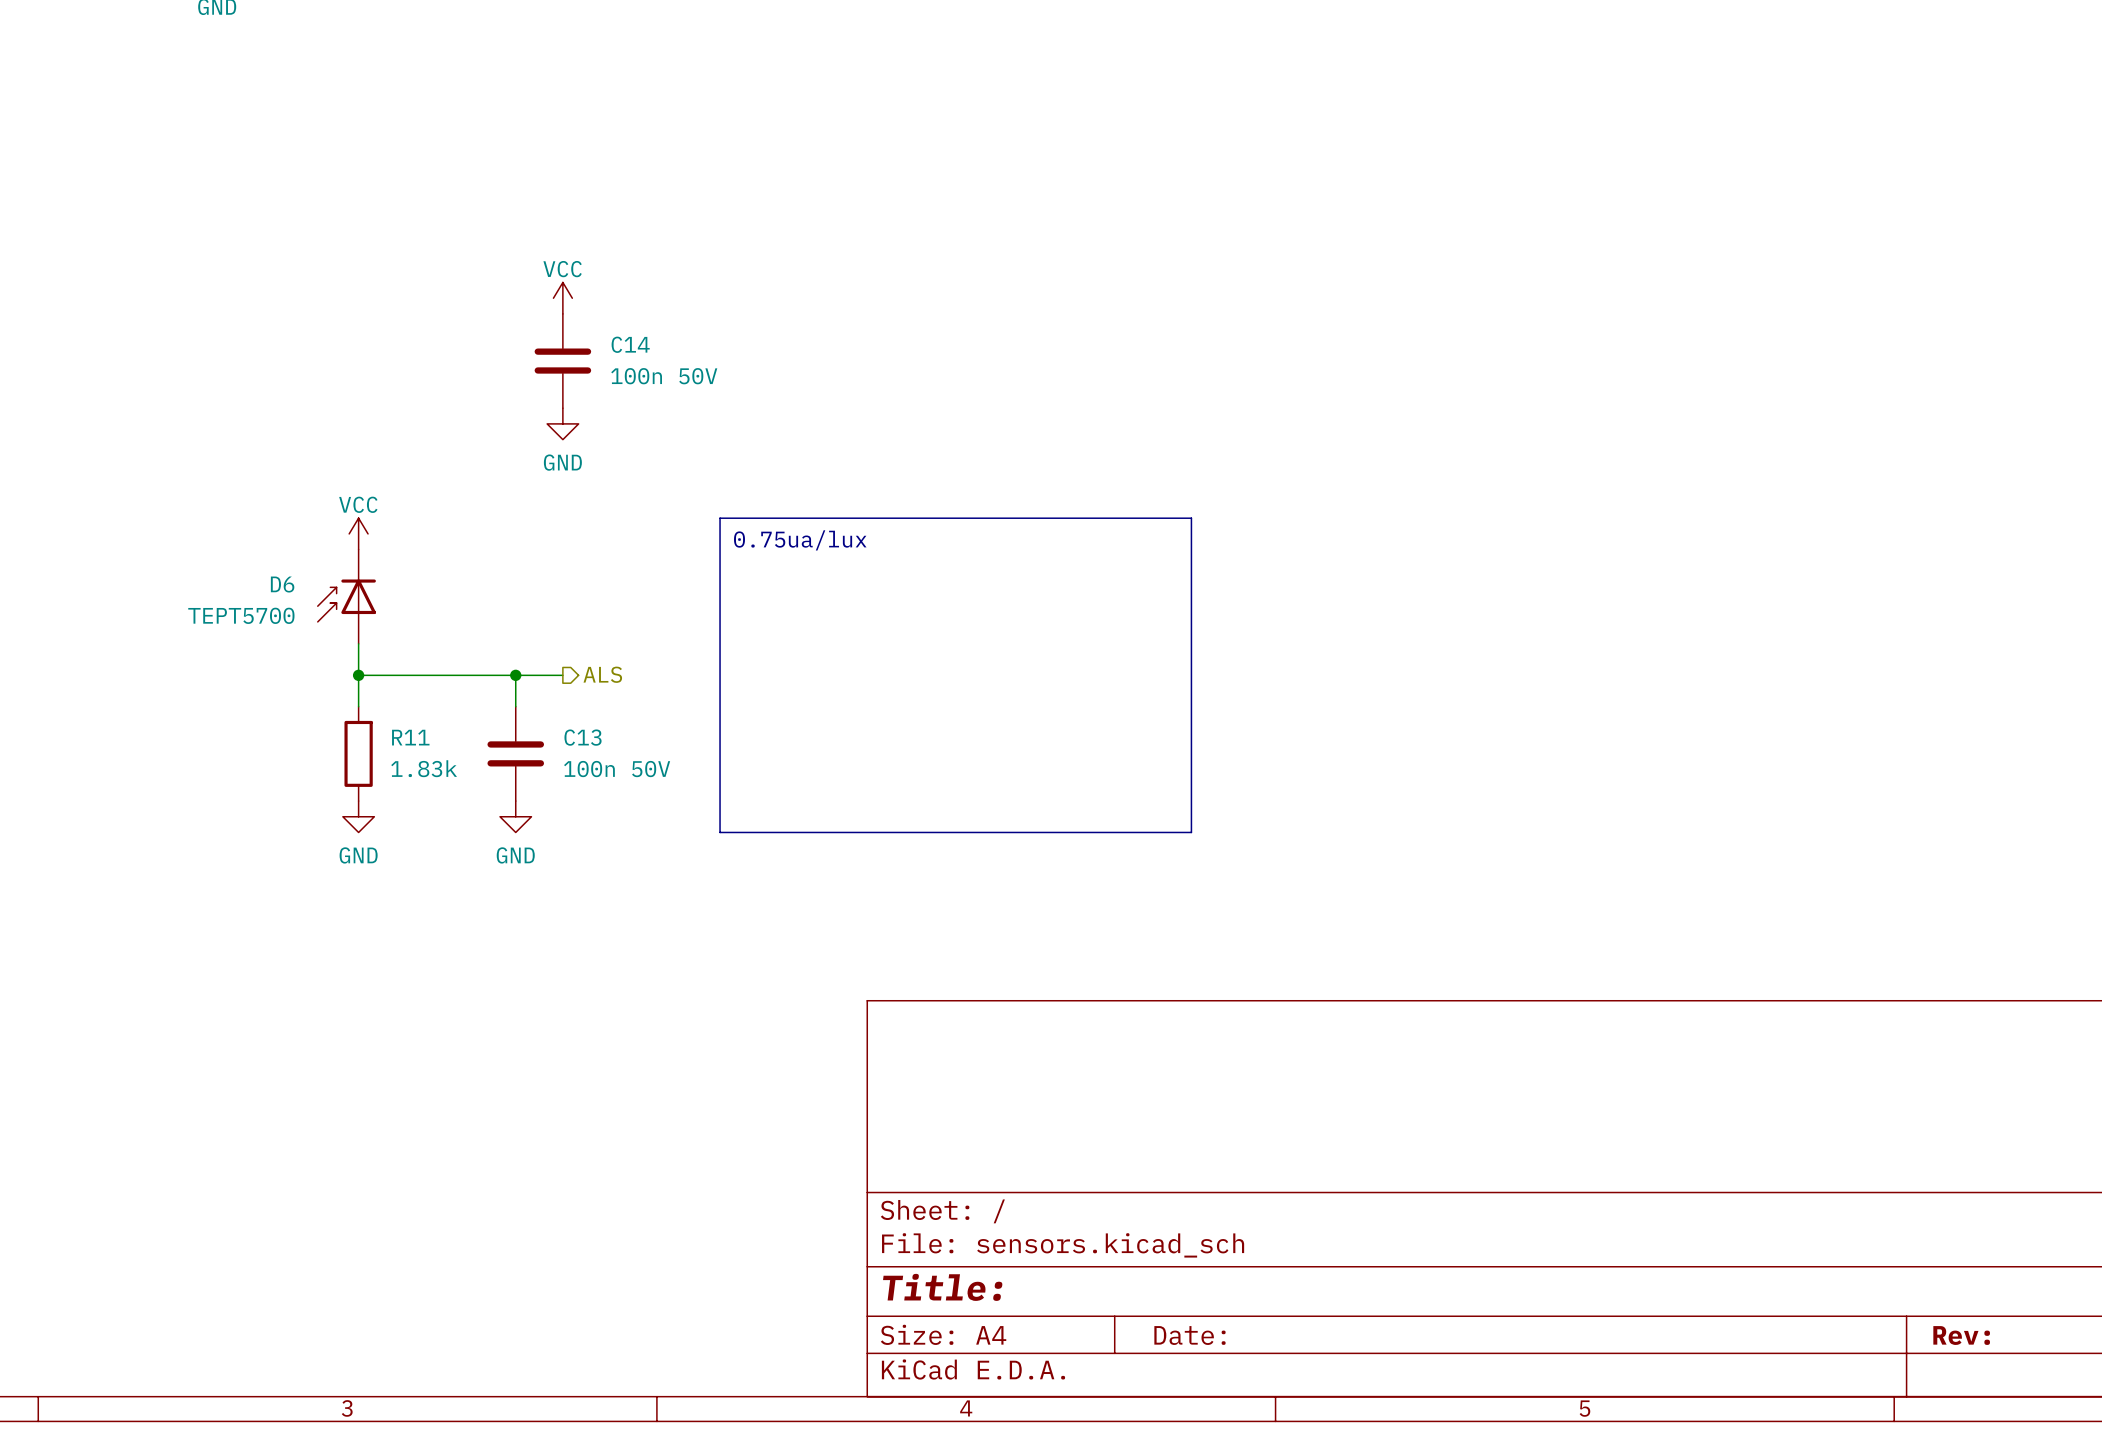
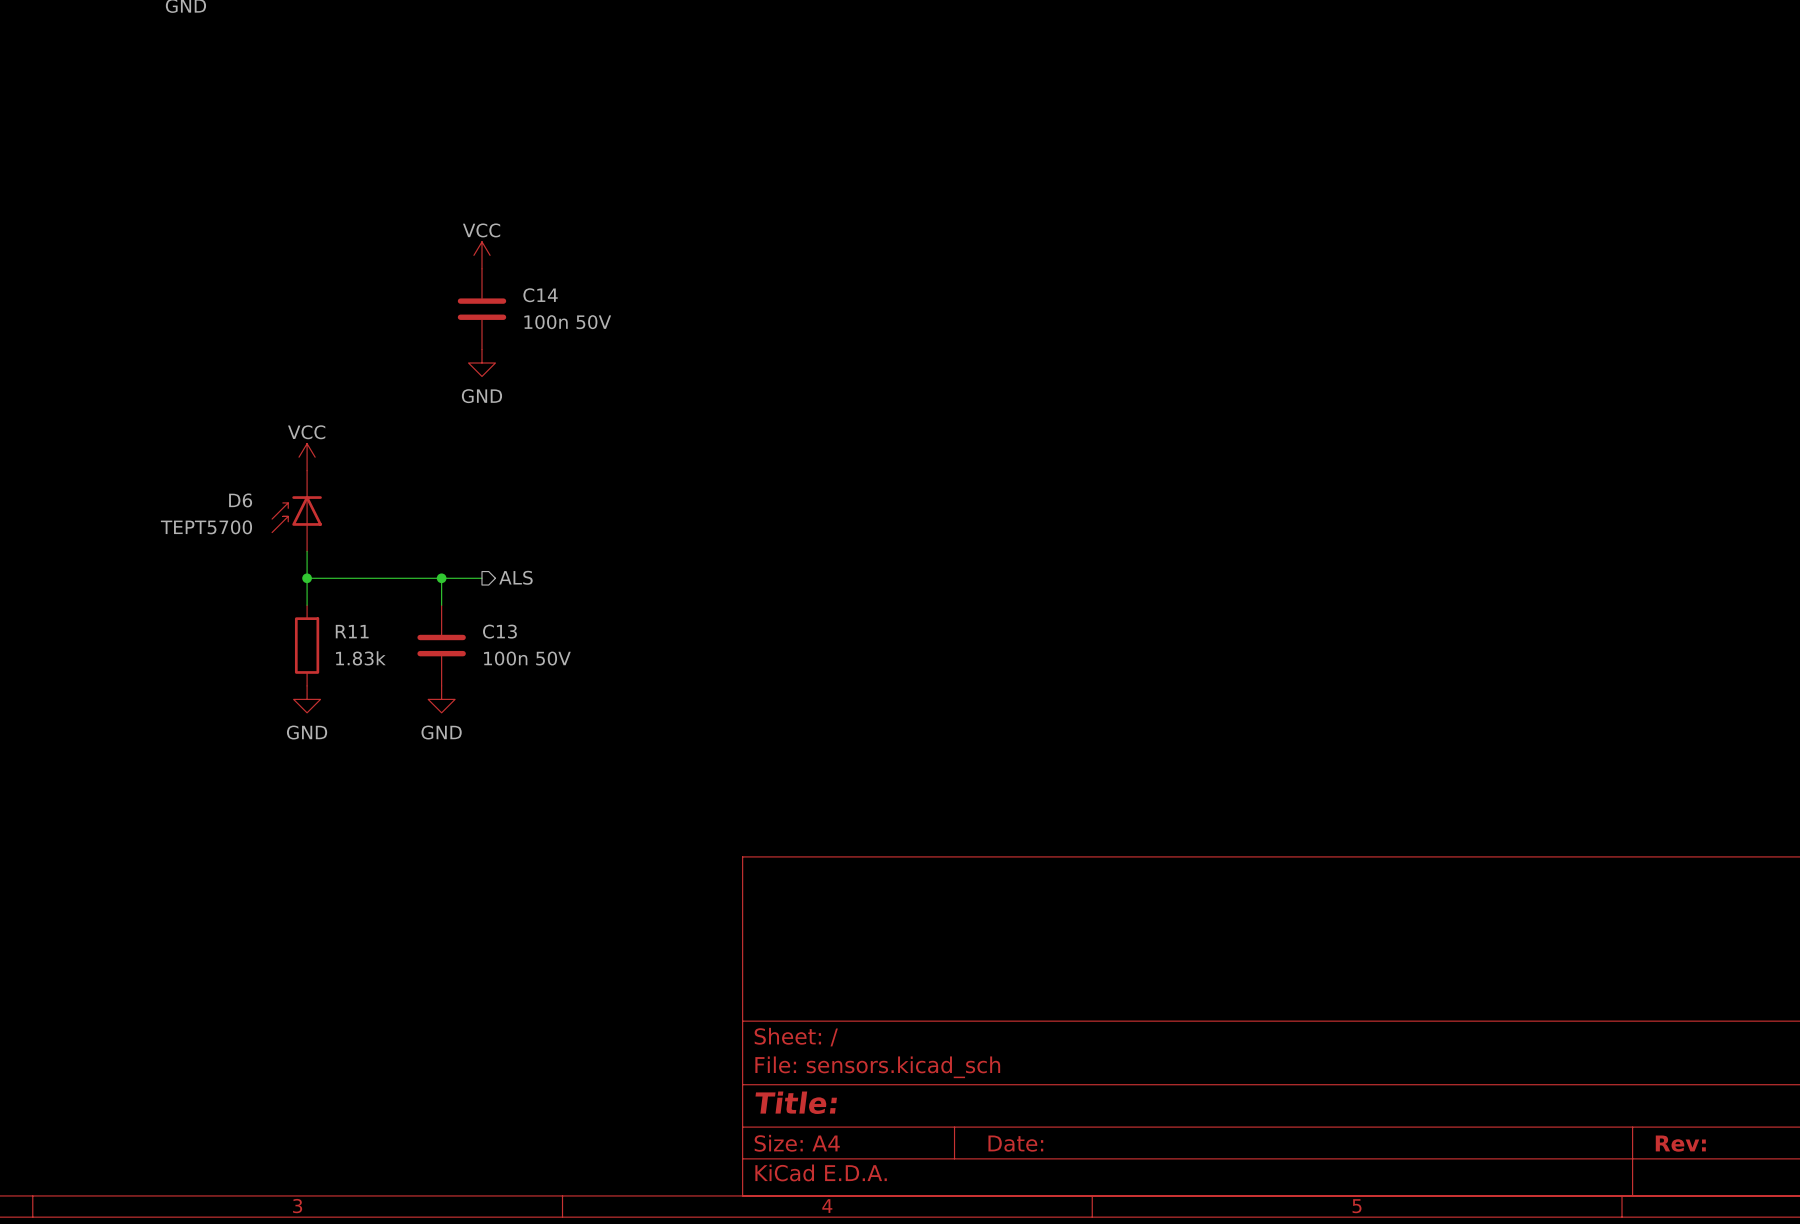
line: (720, 518) (1191, 518) (1191, 832) (720, 832) (720, 518) -> none
text: 0.75ua/lux (800, 540) -> none

